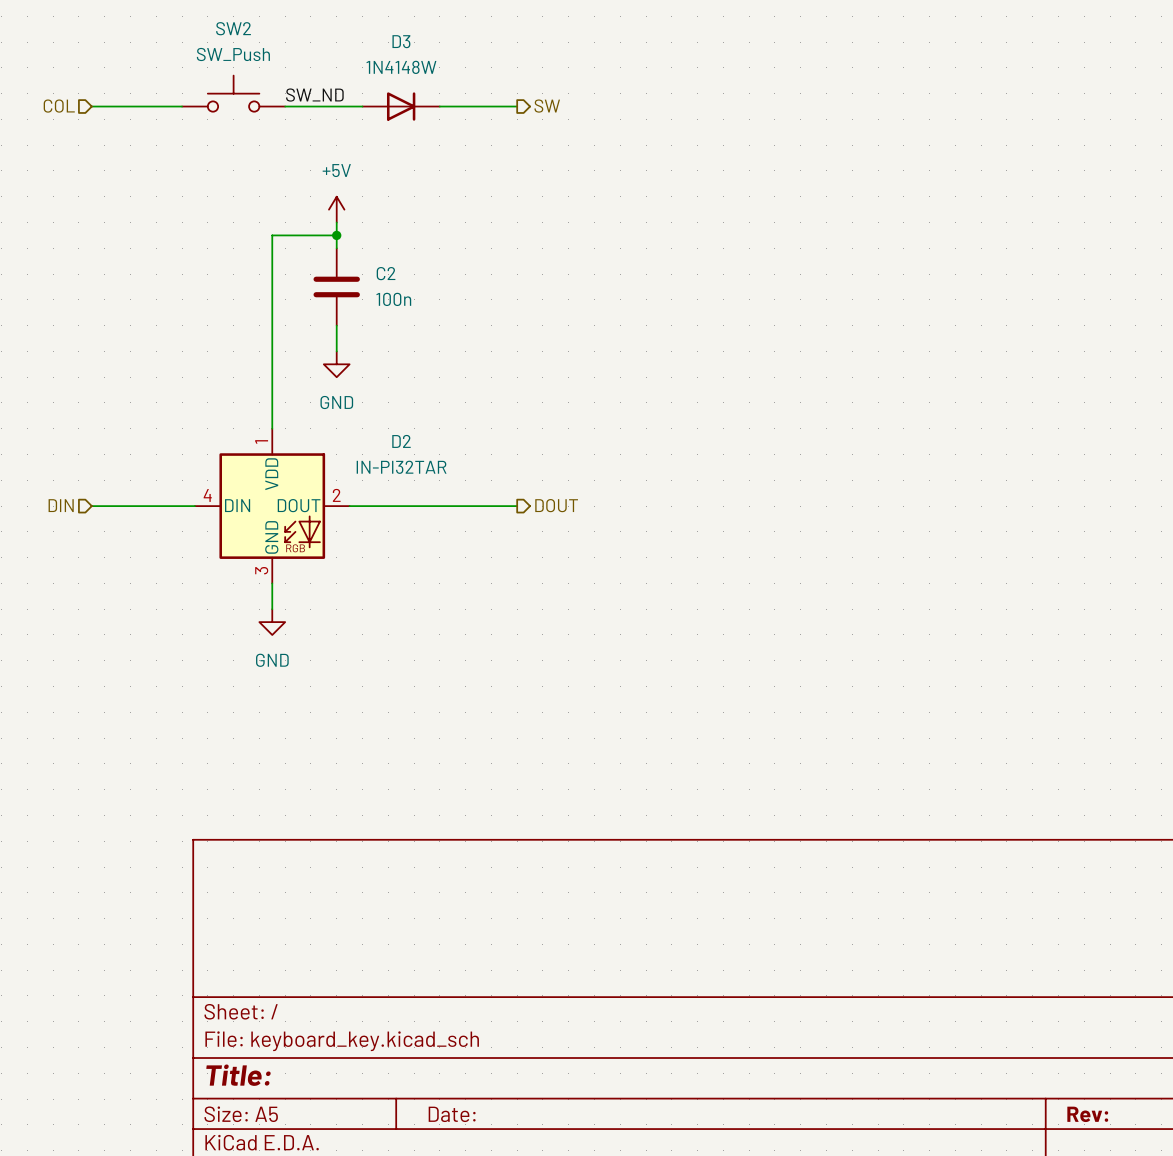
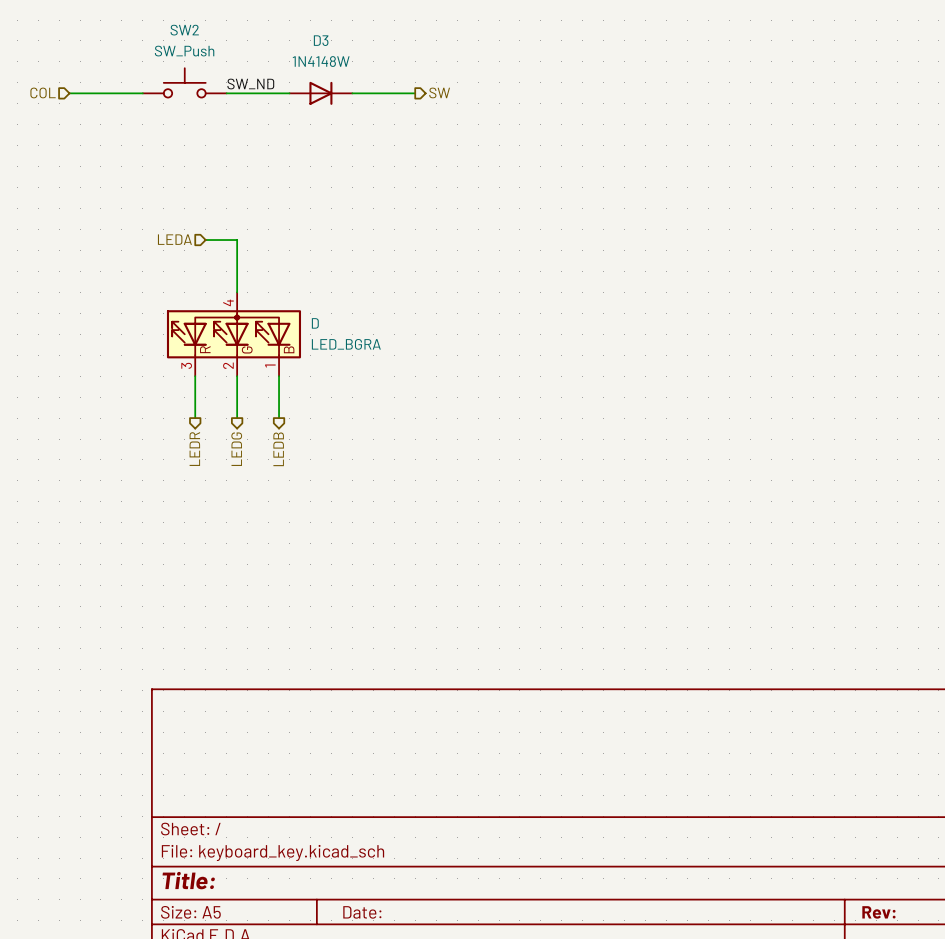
power symbol: +5V (336, 209) -> none
wire: (336, 222) (336, 248) -> none
wire: (336, 235) (272, 235) (272, 428) -> none
junction: (336, 235) -> none
hierarchical label: none -> LEDA (174, 239)
wire: none -> (205, 240) (237, 240) (237, 292)
C2: 100n (336, 286) -> none
wire: (336, 325) (336, 351) -> none
power symbol: GND (336, 364) -> none
D: none -> LED_BGRA (233, 334)
hierarchical label: DIN (61, 505) -> none
hierarchical label: DOUT (556, 505) -> none
wire: (91, 506) (194, 506) -> none
D2: IN-PI32TAR (272, 506) -> none
wire: (349, 506) (517, 506) -> (279, 418) (279, 376)
hierarchical label: none -> LEDR (194, 449)
hierarchical label: none -> LEDG (236, 449)
hierarchical label: none -> LEDB (278, 449)
wire: (272, 583) (272, 609) -> none
power symbol: GND (272, 622) -> none

